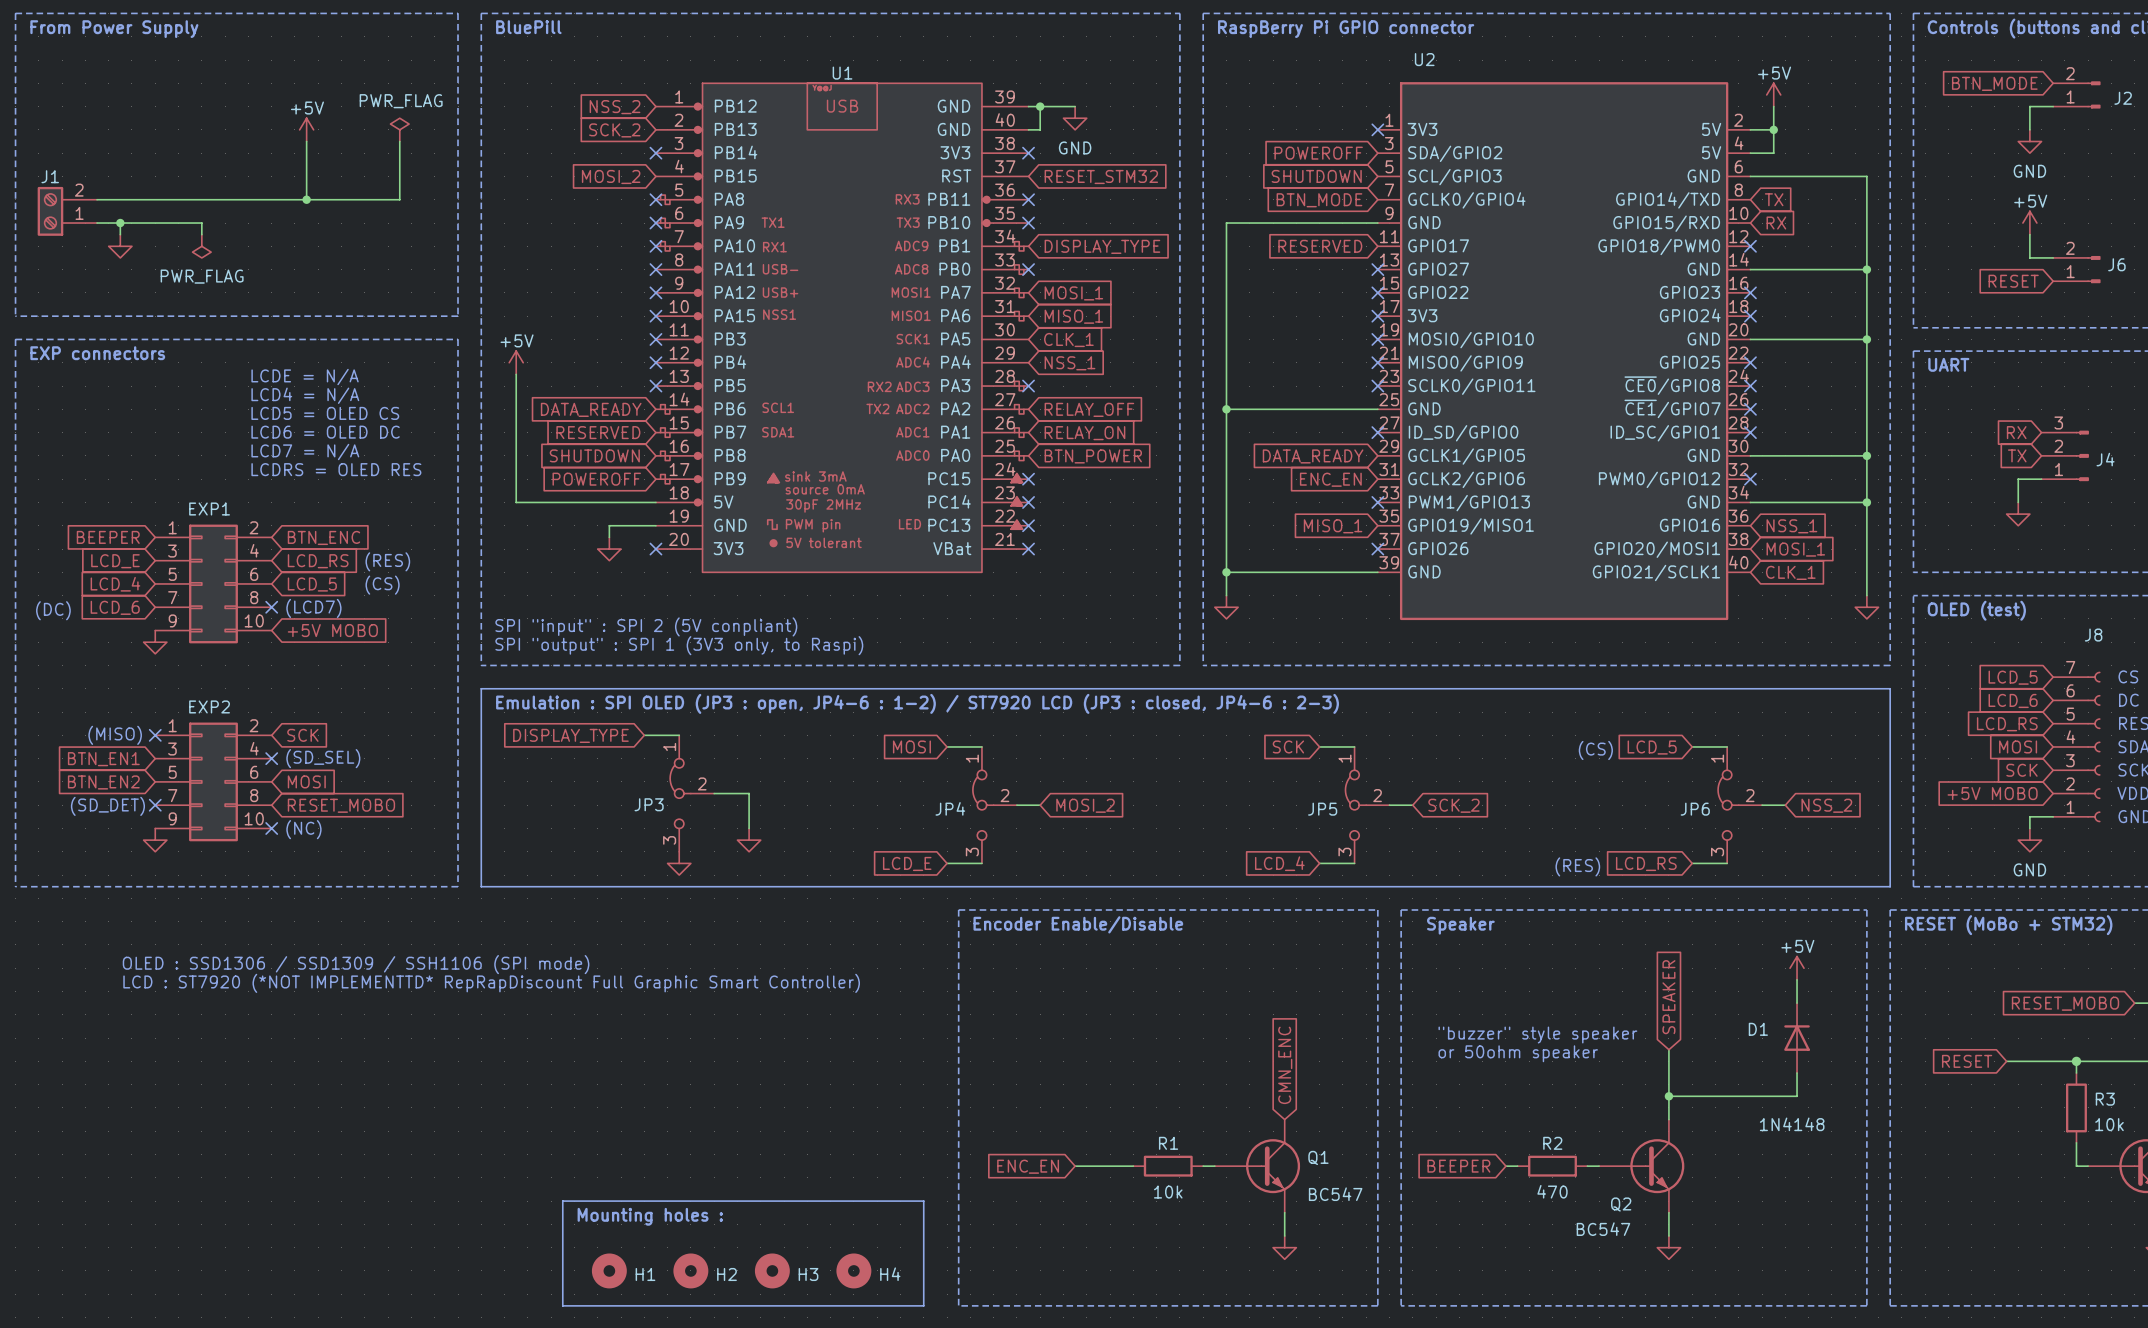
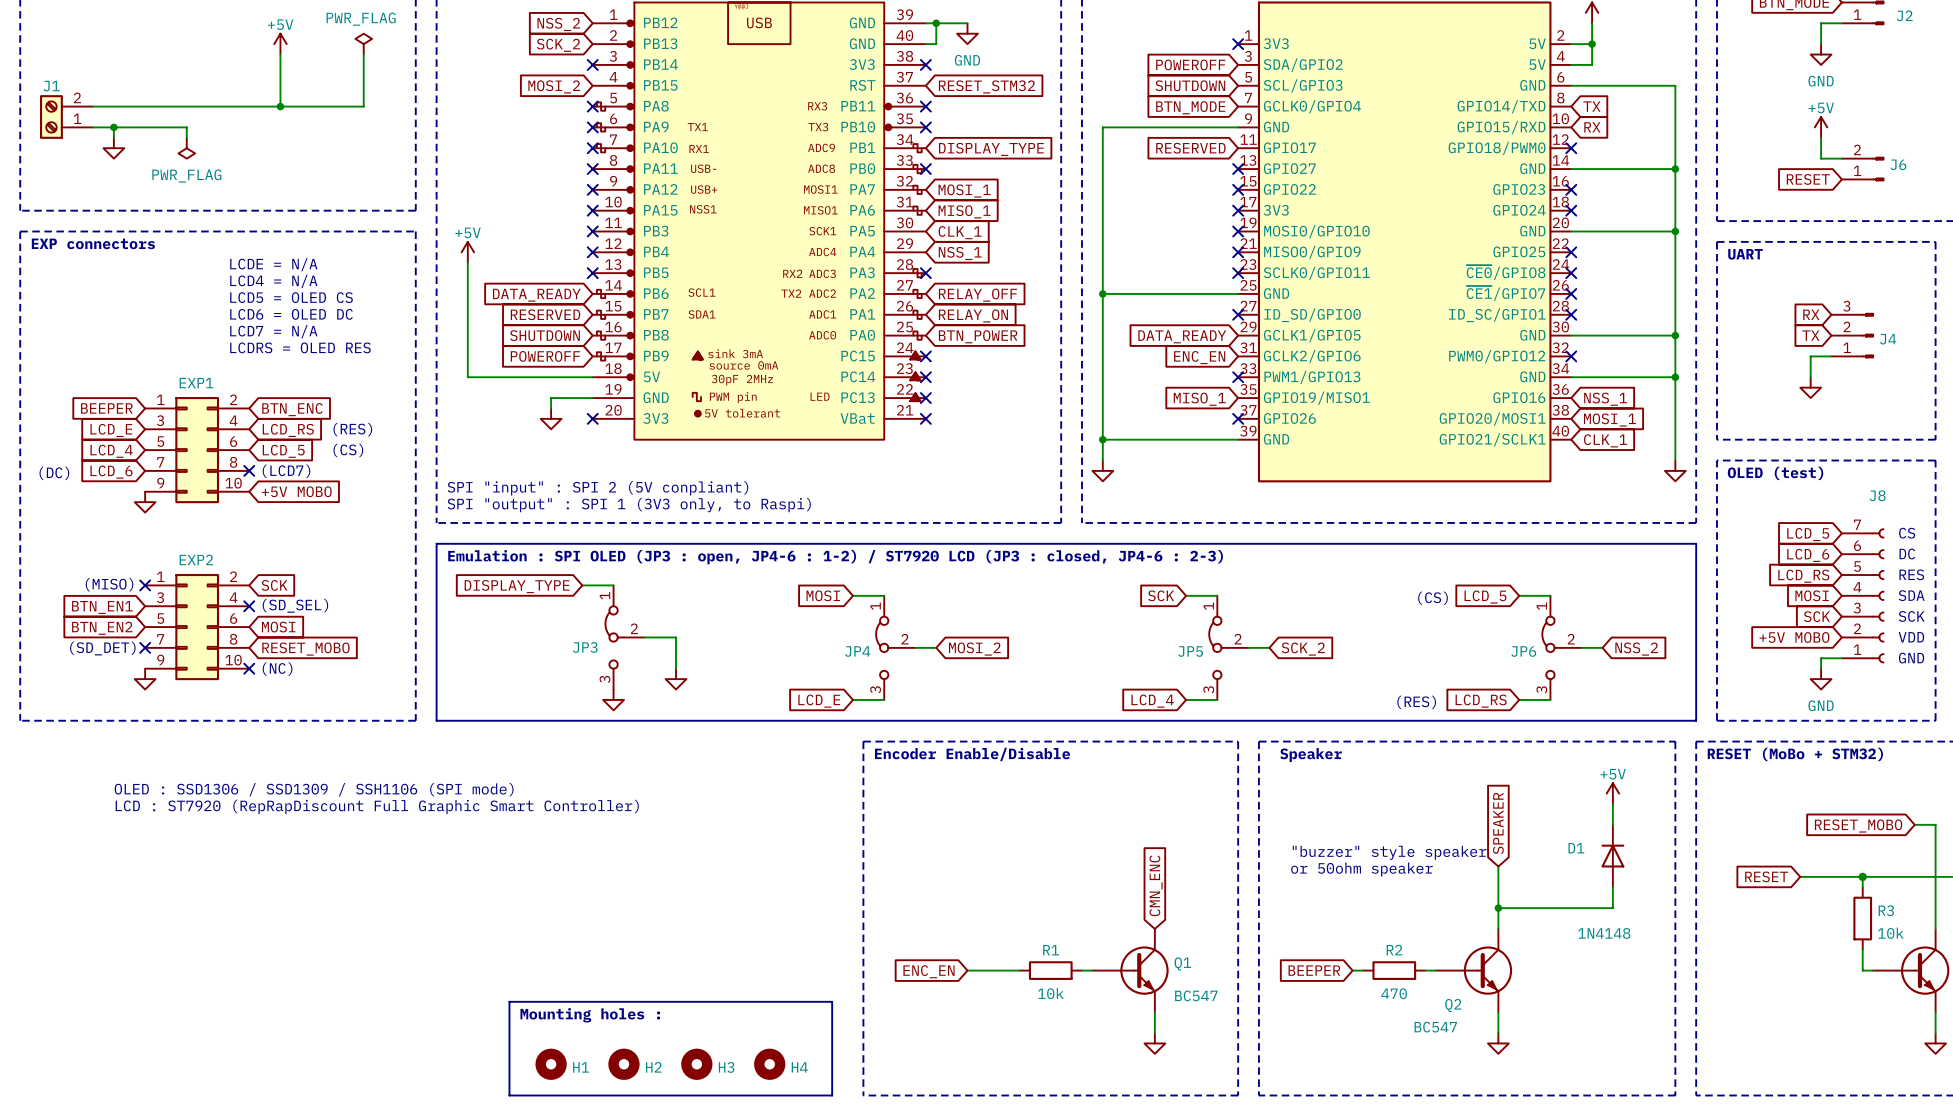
text: LCD : ST7920 (*NOT IMPLEMENTTD* RepRapDiscount Full Graphic Smart Controller) (491, 983) -> LCD : ST7920 (RepRapDiscount Full Graphic Smart Controller) (377, 806)

